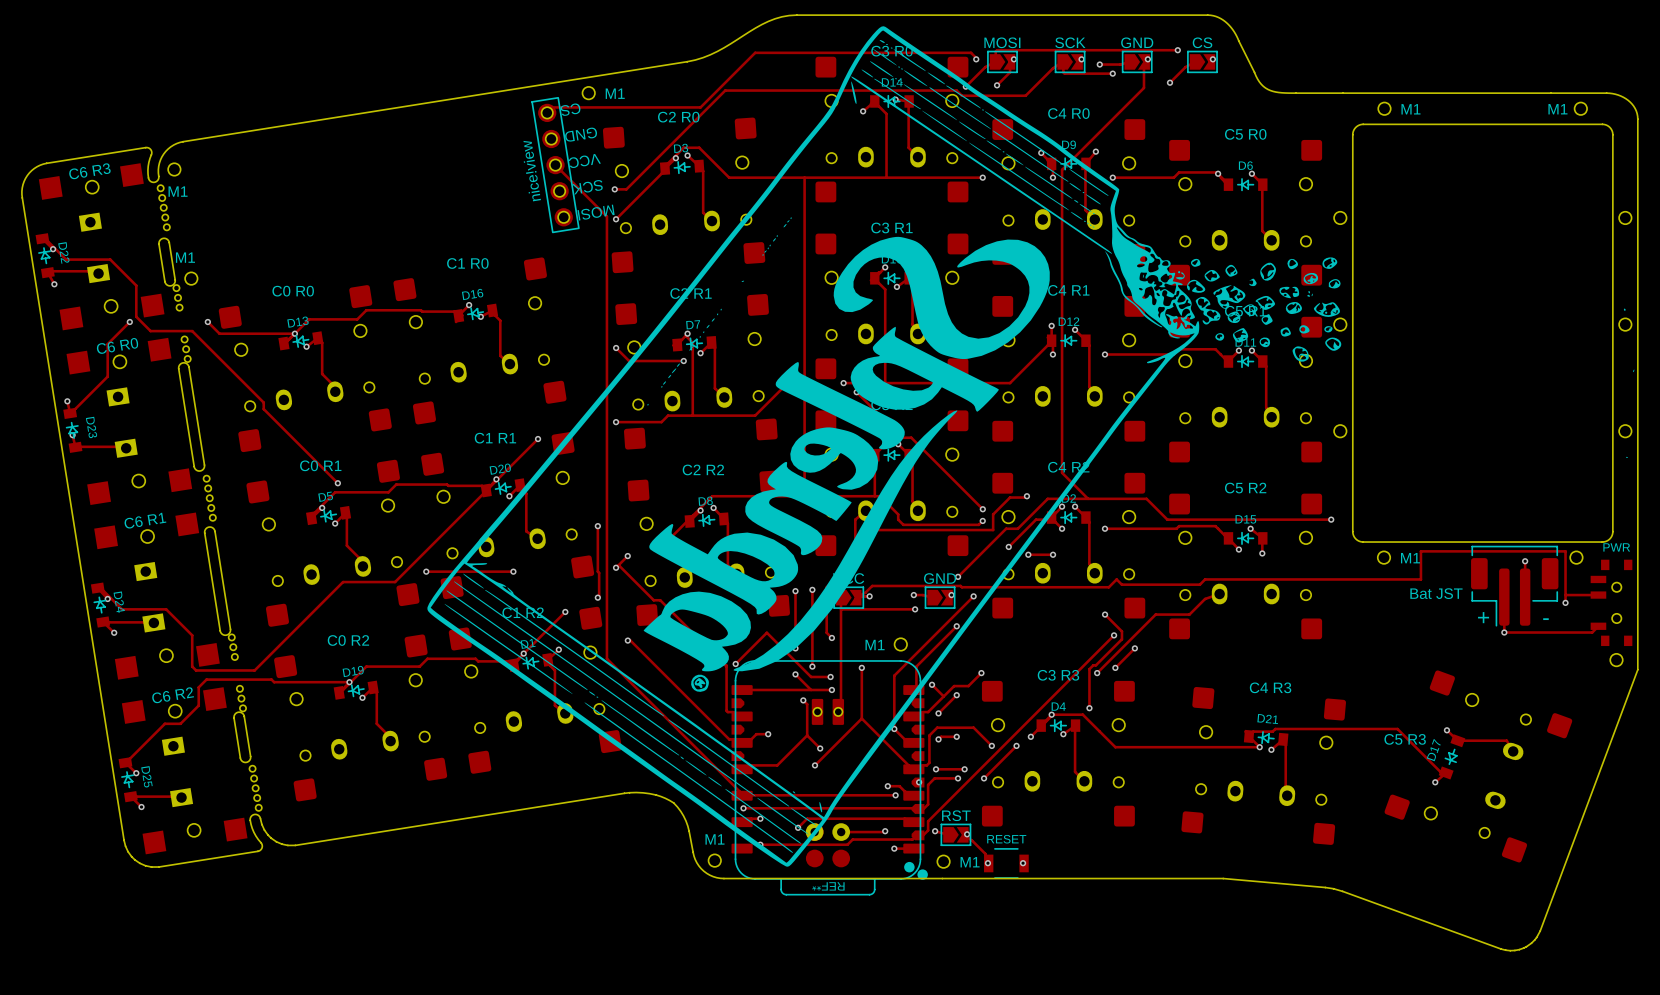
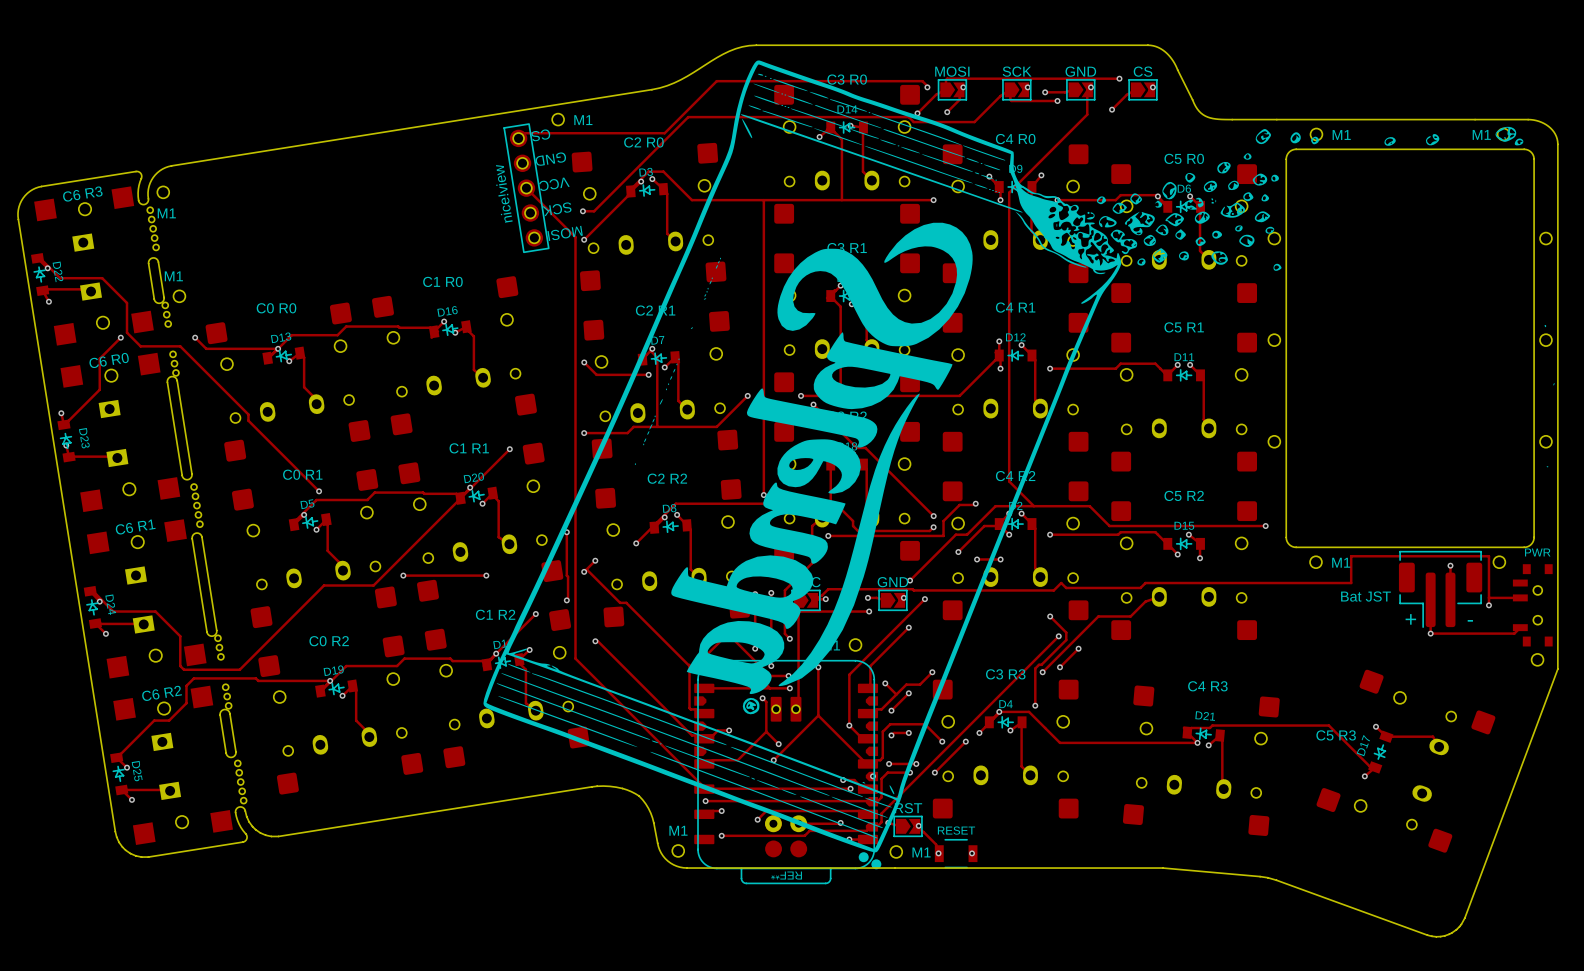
drawing: [427, 26, 1342, 867] -> none
drawing: none -> [483, 60, 1279, 853]
drawing shape: [861, 69, 874, 78] -> [809, 91, 829, 99]
drawing shape: [903, 70, 928, 87] -> [868, 112, 871, 114]
drawing shape: [895, 78, 897, 80] -> [829, 99, 868, 112]
drawing shape: [851, 81, 857, 104] -> [790, 108, 849, 129]
drawing: none -> [1495, 126, 1524, 146]
drawing: none -> [1243, 129, 1272, 160]
drawing: none -> [1290, 132, 1319, 145]
drawing: none -> [1425, 134, 1440, 146]
drawing shape: [921, 110, 968, 142] -> [897, 145, 900, 147]
drawing: none -> [1384, 137, 1396, 146]
drawing shape: [986, 140, 1002, 151] -> [921, 154, 974, 173]
drawing: none -> [1273, 263, 1282, 271]
drawing position: (1309, 292) -> (1212, 199)
drawing position: (597, 697) -> (660, 743)

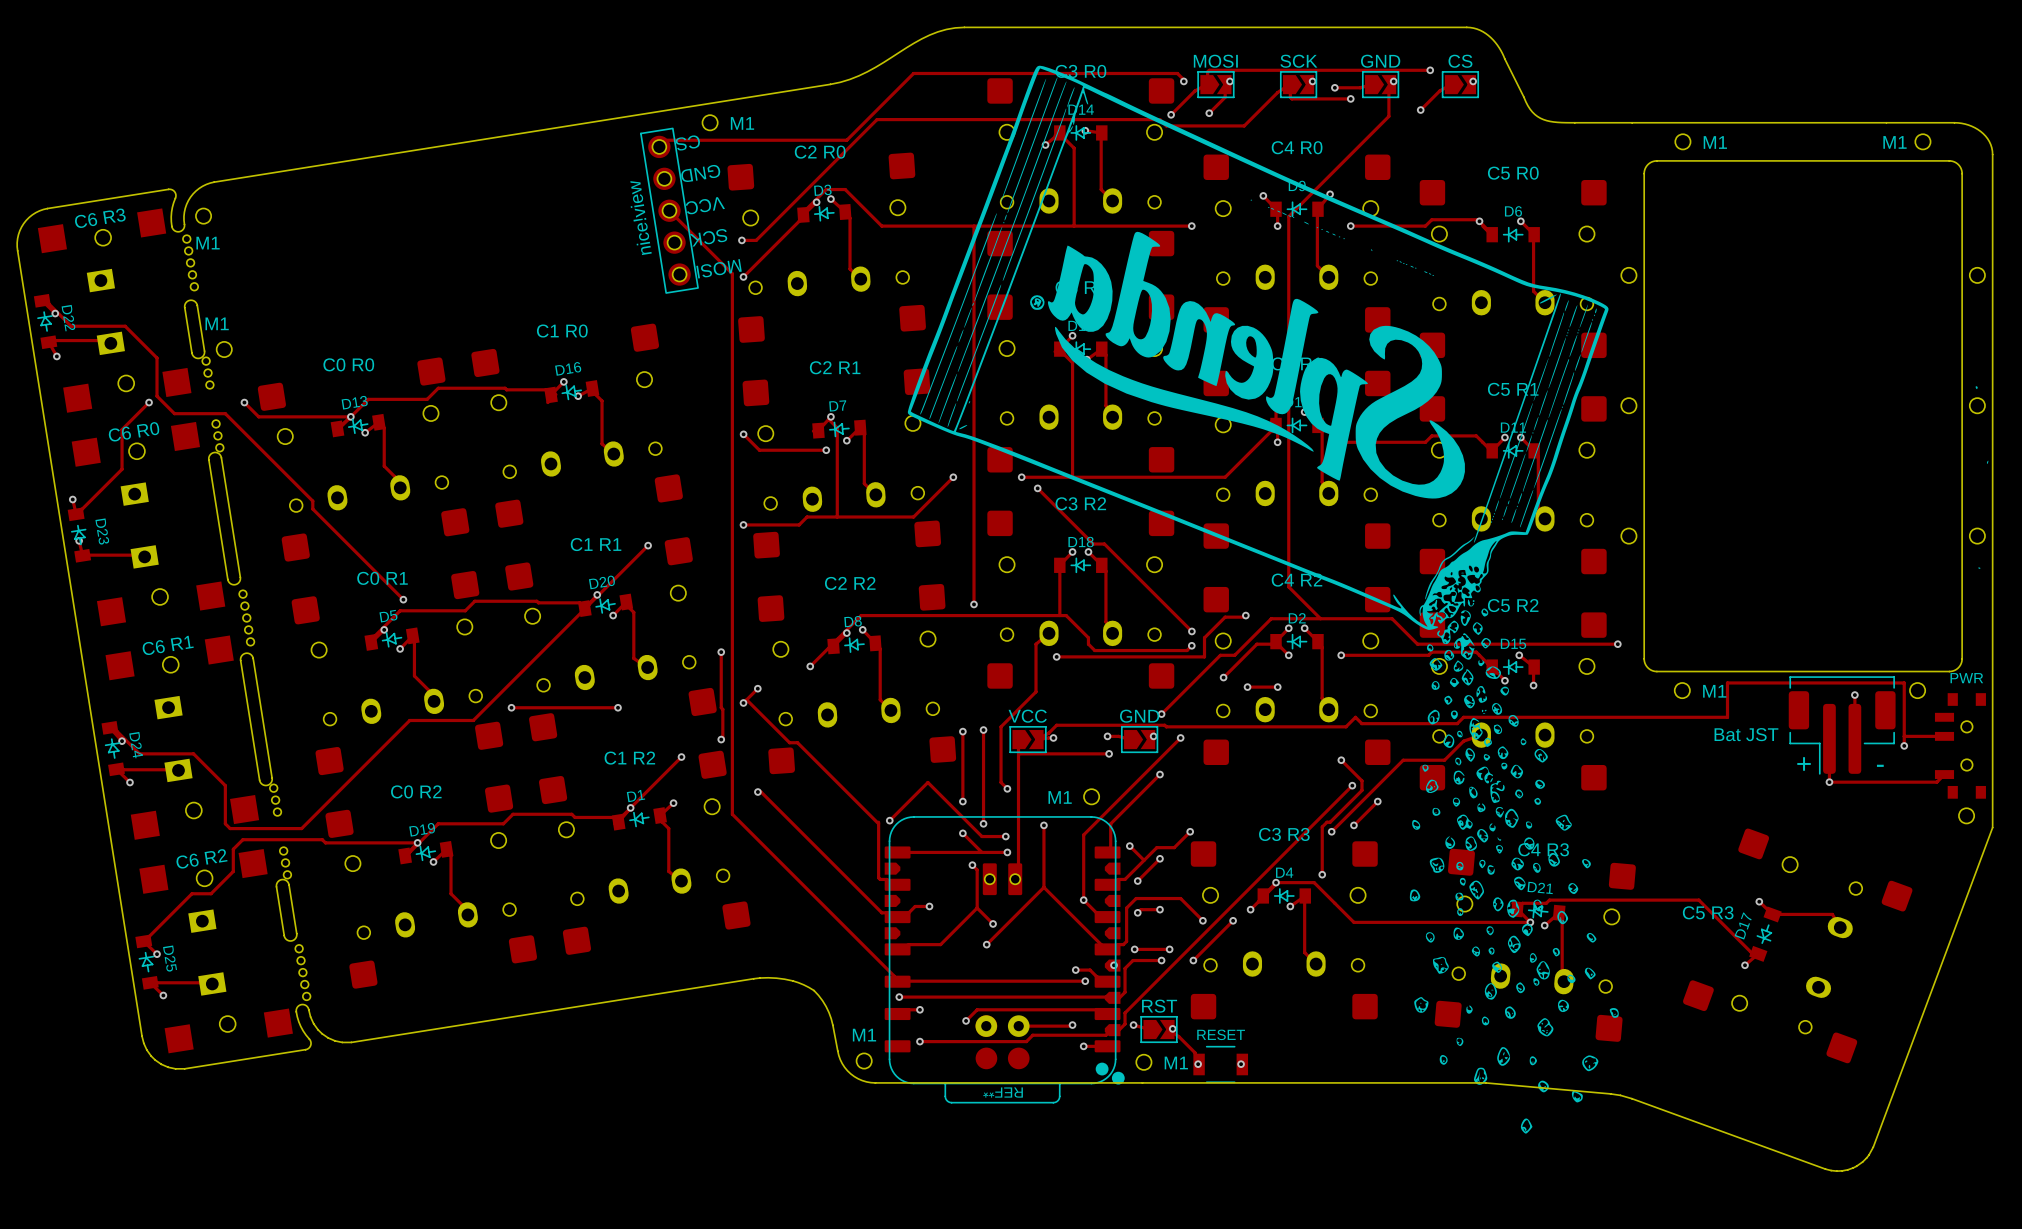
drawing: [483, 60, 1279, 853] -> none
drawing: none -> [907, 65, 1609, 1026]
drawing: [1495, 126, 1524, 146] -> none
drawing: [1243, 129, 1272, 160] -> none
drawing: [1290, 132, 1319, 145] -> none
drawing: [1425, 134, 1440, 146] -> none
drawing: [1384, 137, 1396, 146] -> none
drawing: [1273, 263, 1282, 271] -> none
drawing: none -> [1555, 814, 1572, 831]
drawing: none -> [1568, 859, 1591, 895]
drawing: none -> [1409, 889, 1421, 902]
drawing: none -> [1425, 932, 1449, 974]
drawing: none -> [1586, 932, 1597, 943]
drawing: none -> [1567, 967, 1596, 984]
drawing: none -> [1414, 997, 1429, 1013]
drawing: none -> [1537, 999, 1570, 1037]
drawing: none -> [1609, 1008, 1619, 1018]
drawing: none -> [1439, 1037, 1464, 1065]
drawing: none -> [1473, 1047, 1511, 1085]
drawing: none -> [1582, 1055, 1599, 1072]
drawing: none -> [1529, 1056, 1538, 1066]
drawing: none -> [1538, 1080, 1549, 1093]
drawing: none -> [1571, 1090, 1583, 1103]
drawing: none -> [1520, 1118, 1533, 1134]

